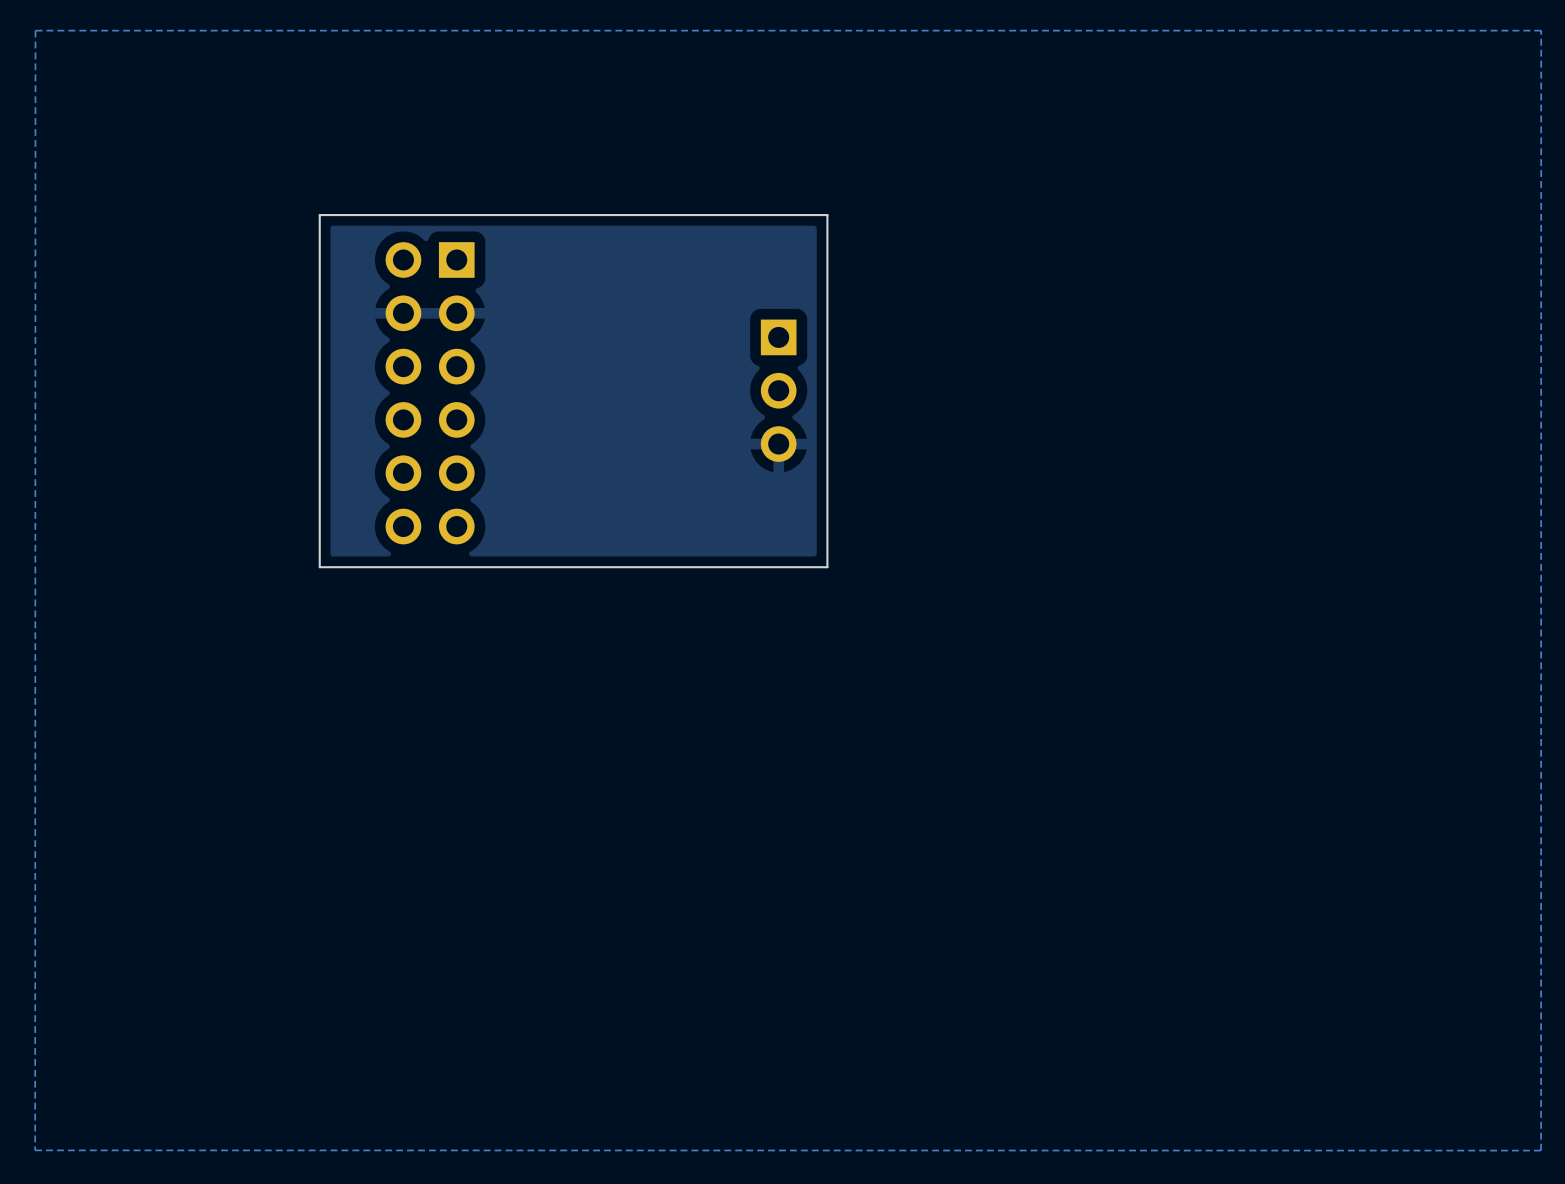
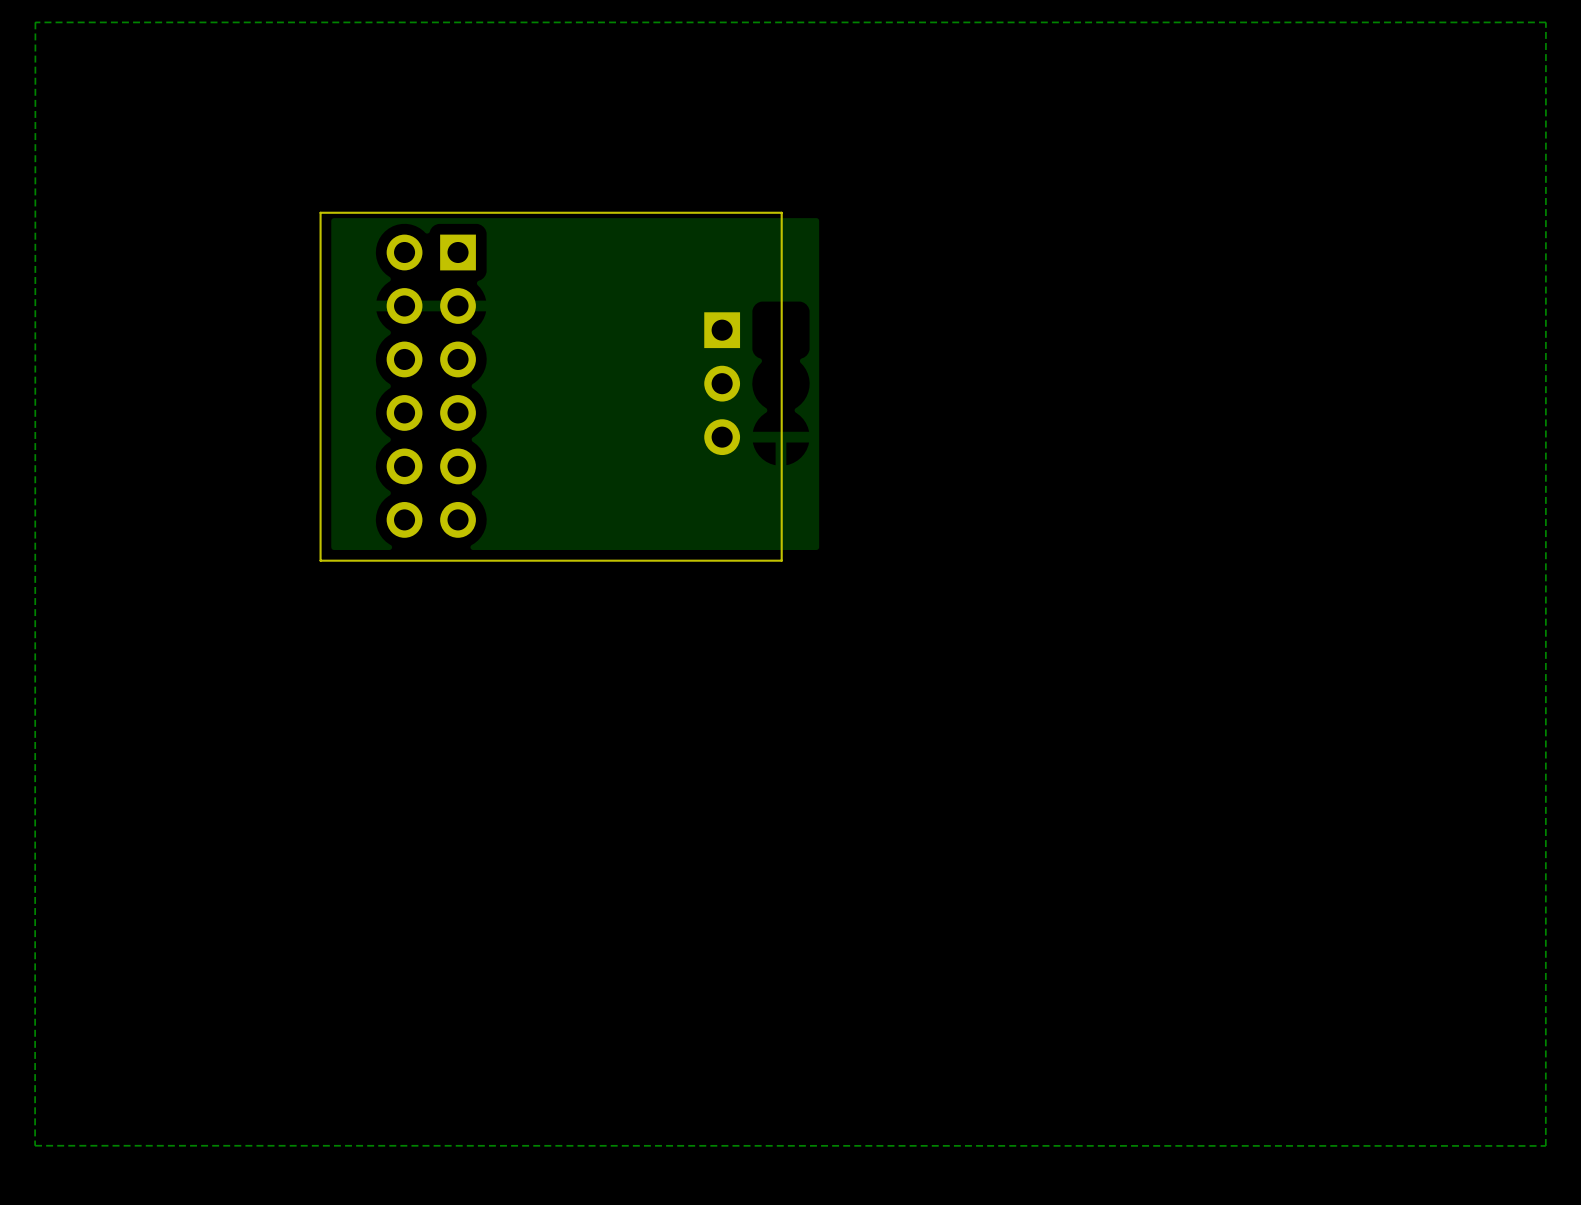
board edge: (319, 220) (319, 215) (827, 215) (827, 567) (779, 567) -> (320, 212) (781, 212) (781, 560)
part position: (778, 390) -> (722, 383)

